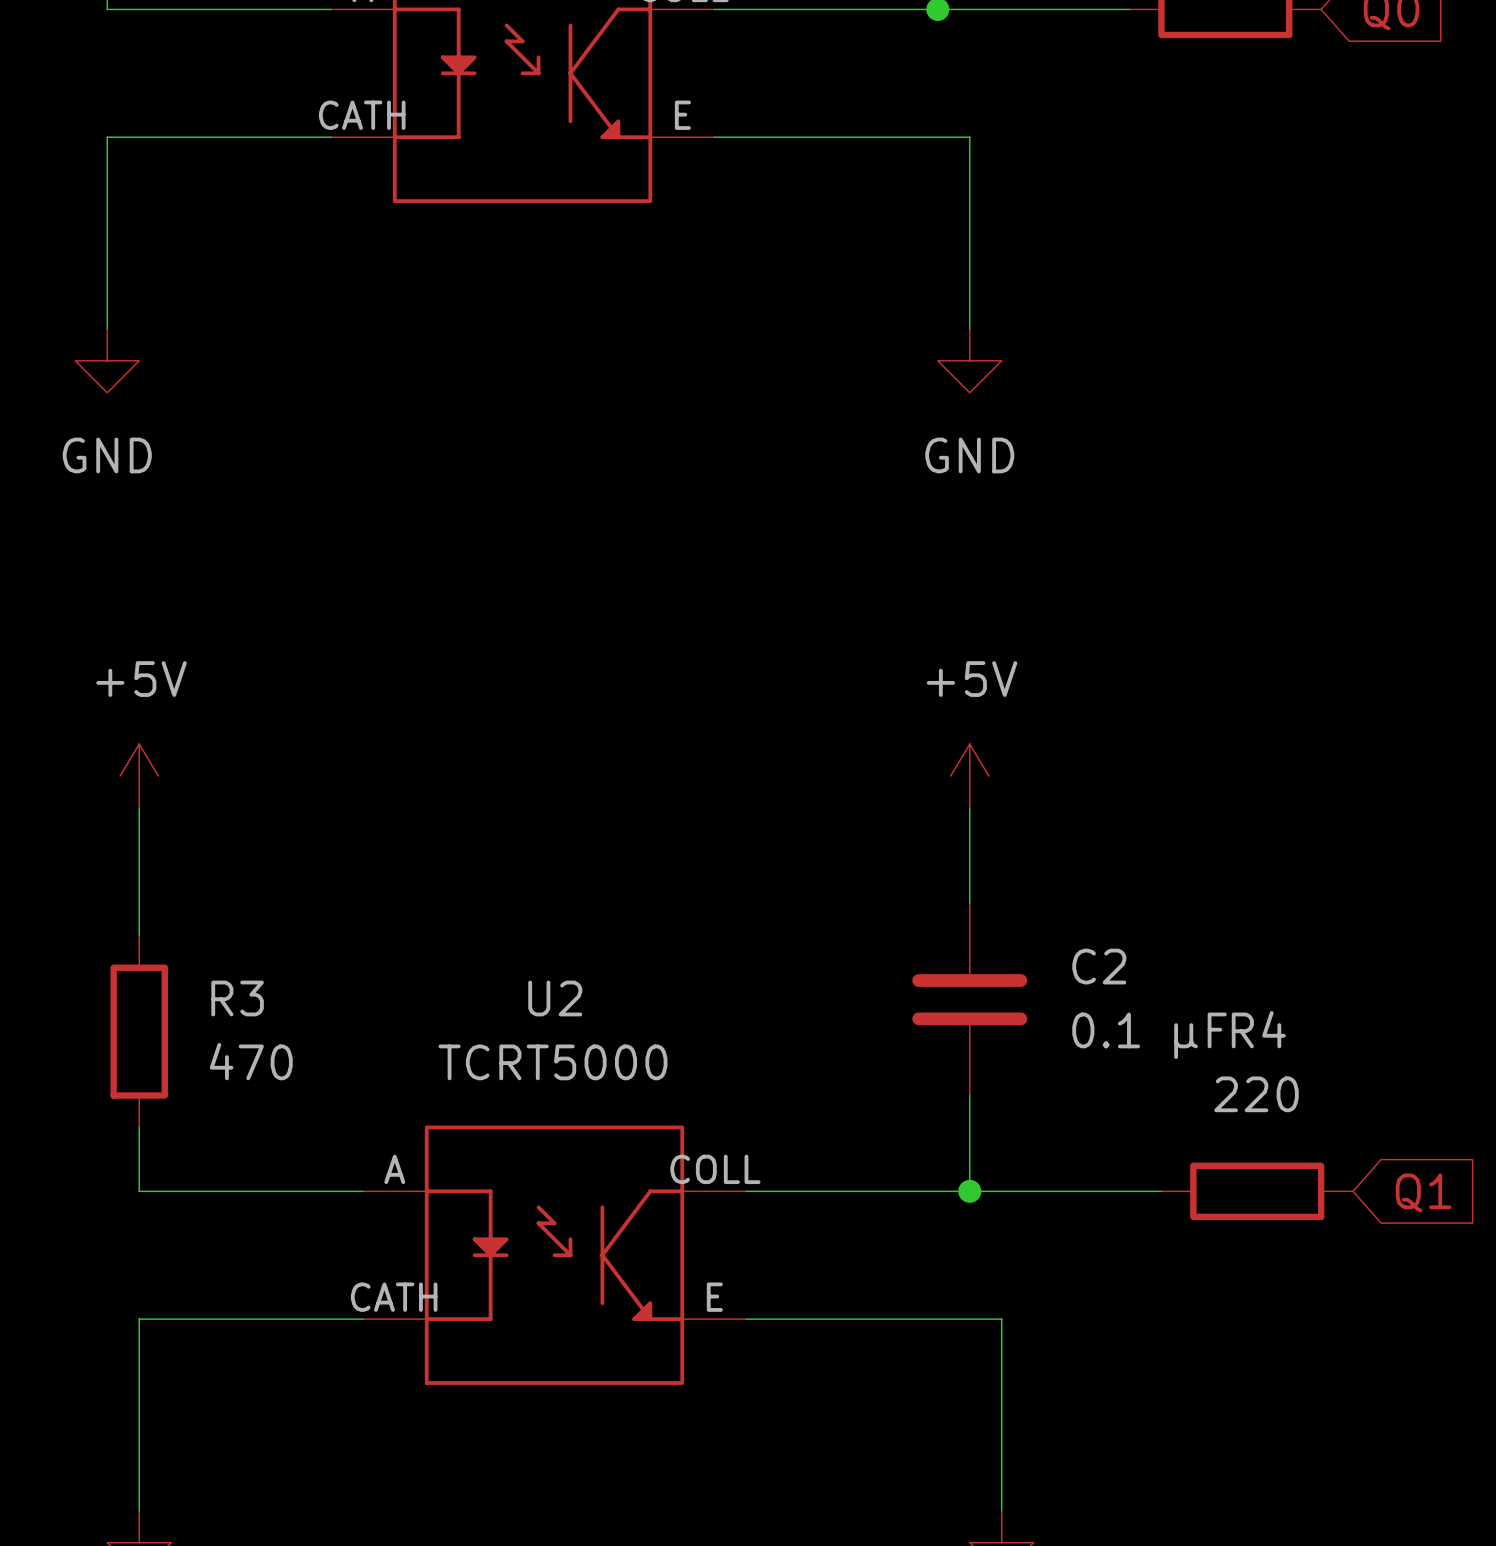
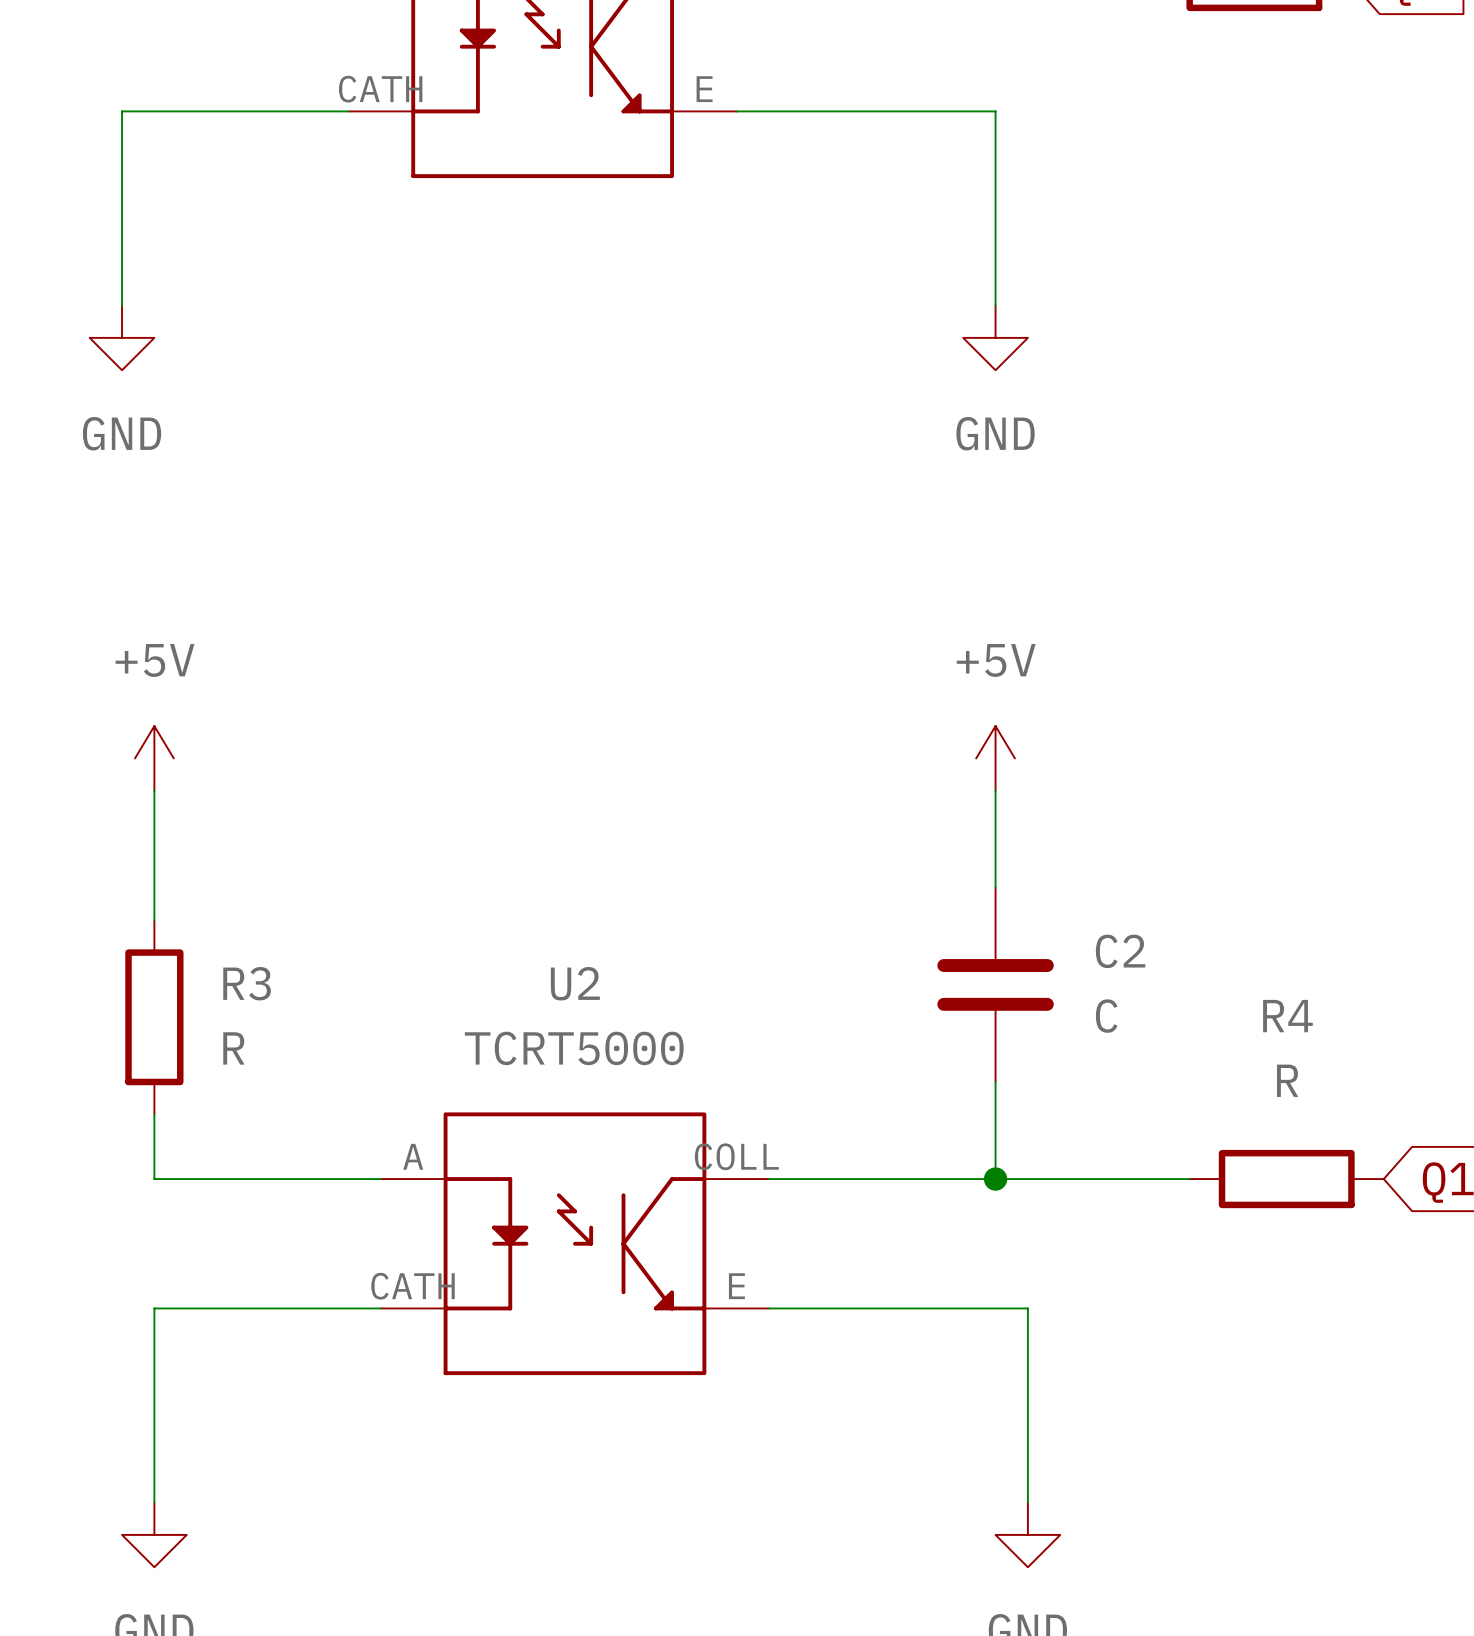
C2 value: 0.1 µF (1149, 1035) -> C (1106, 1016)
R3 value: 470 (251, 1061) -> R (233, 1048)
R4 value: 220 (1256, 1094) -> R (1287, 1080)

